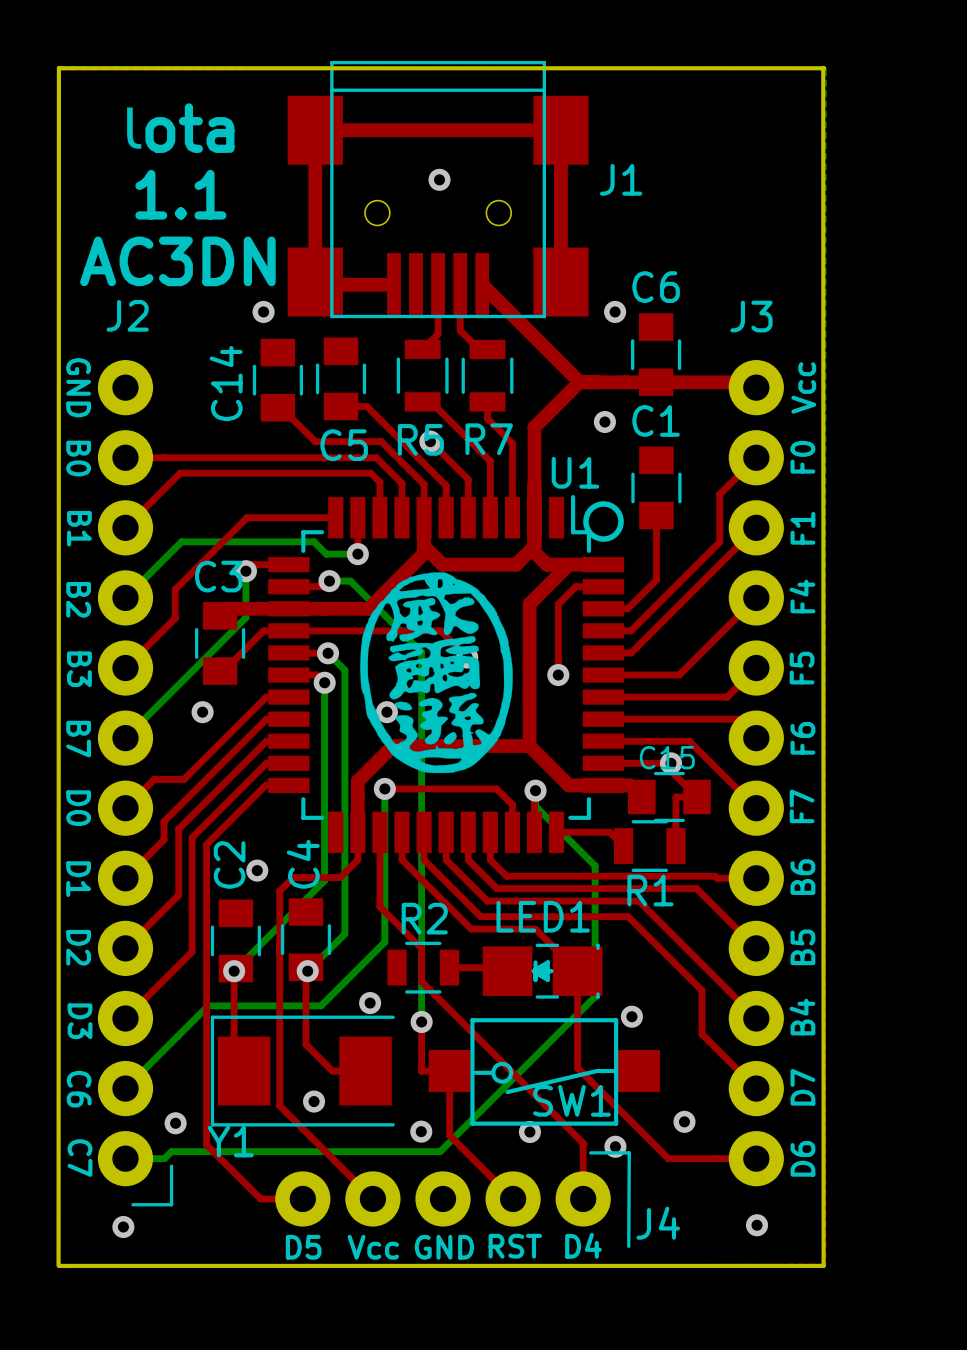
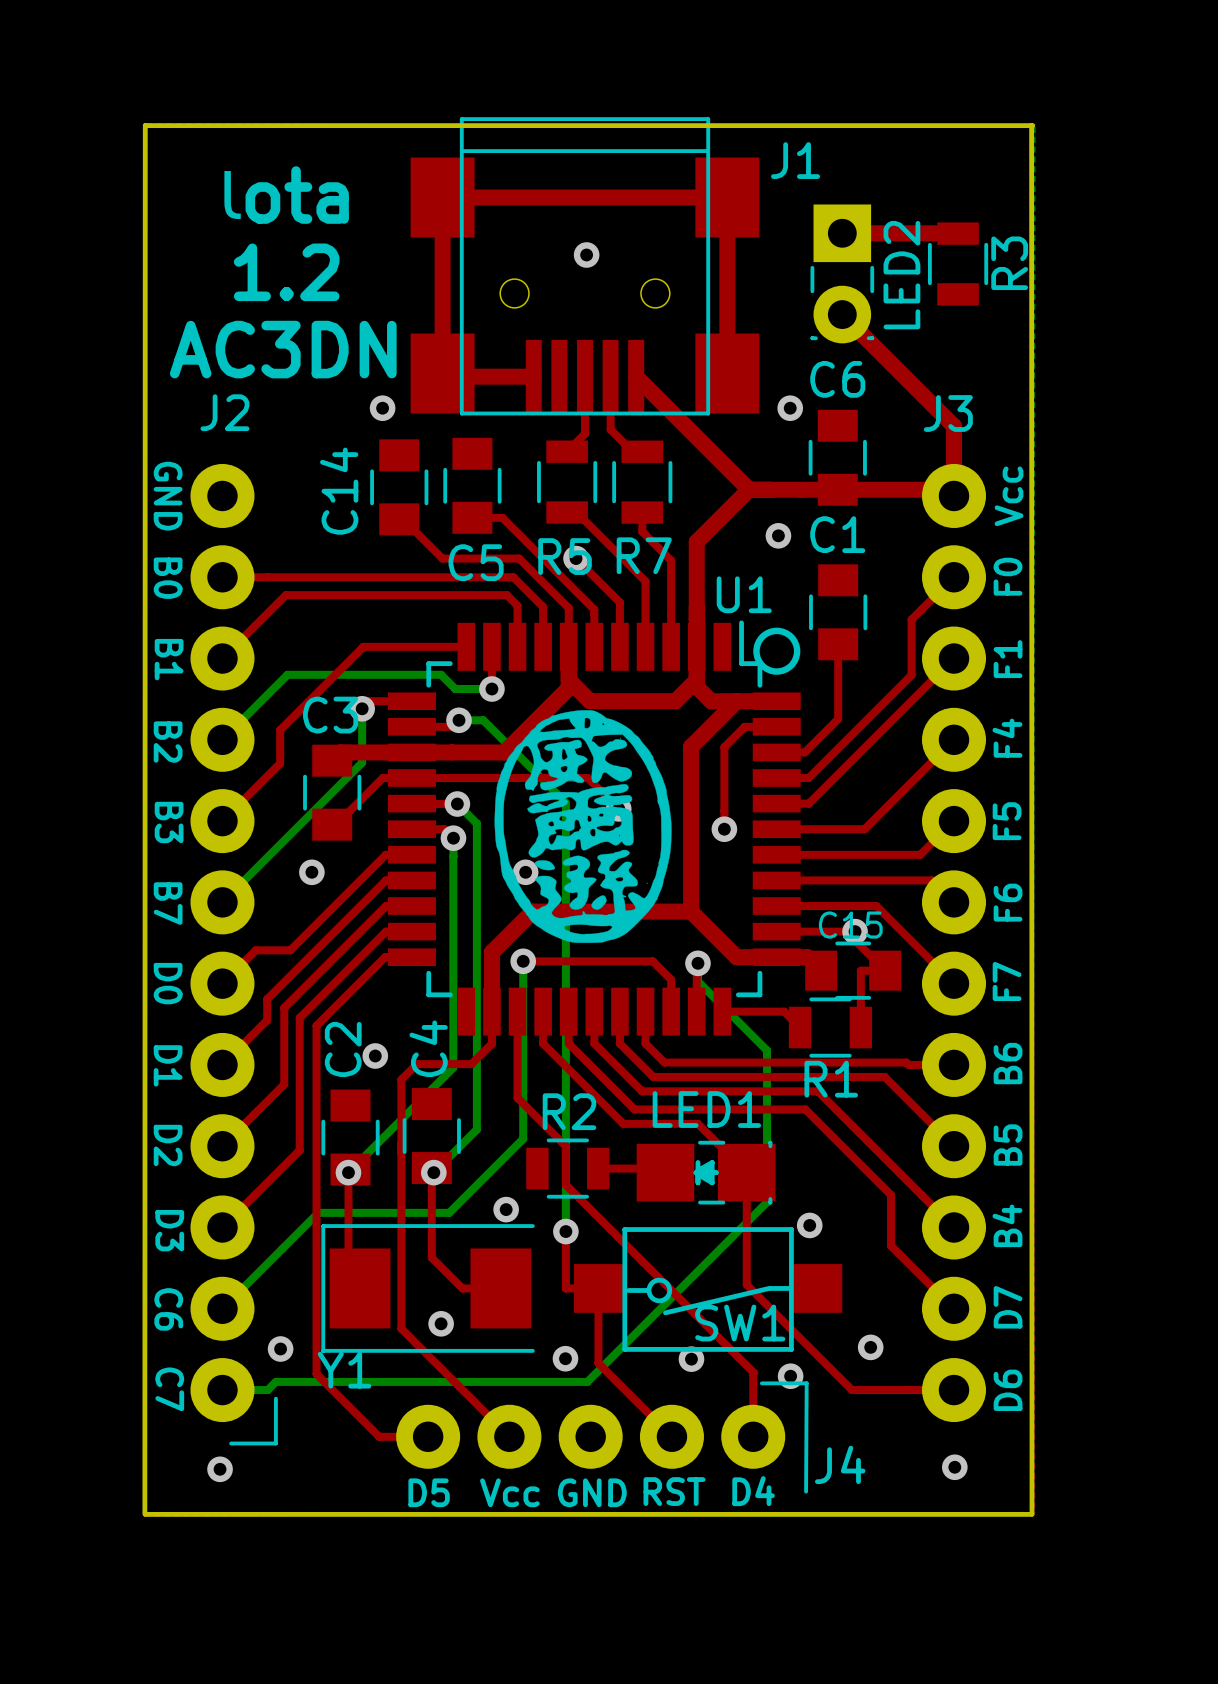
top track: none -> (842, 233) (957, 233)
J1 name position: J1 (621, 179) -> J1 (795, 160)
R3: none -> (958, 264)
text: 1.1 (180, 194) -> 1.2 (286, 272)
LED2: none -> (842, 273)
top track: none -> (842, 314) (954, 426) (954, 495)

